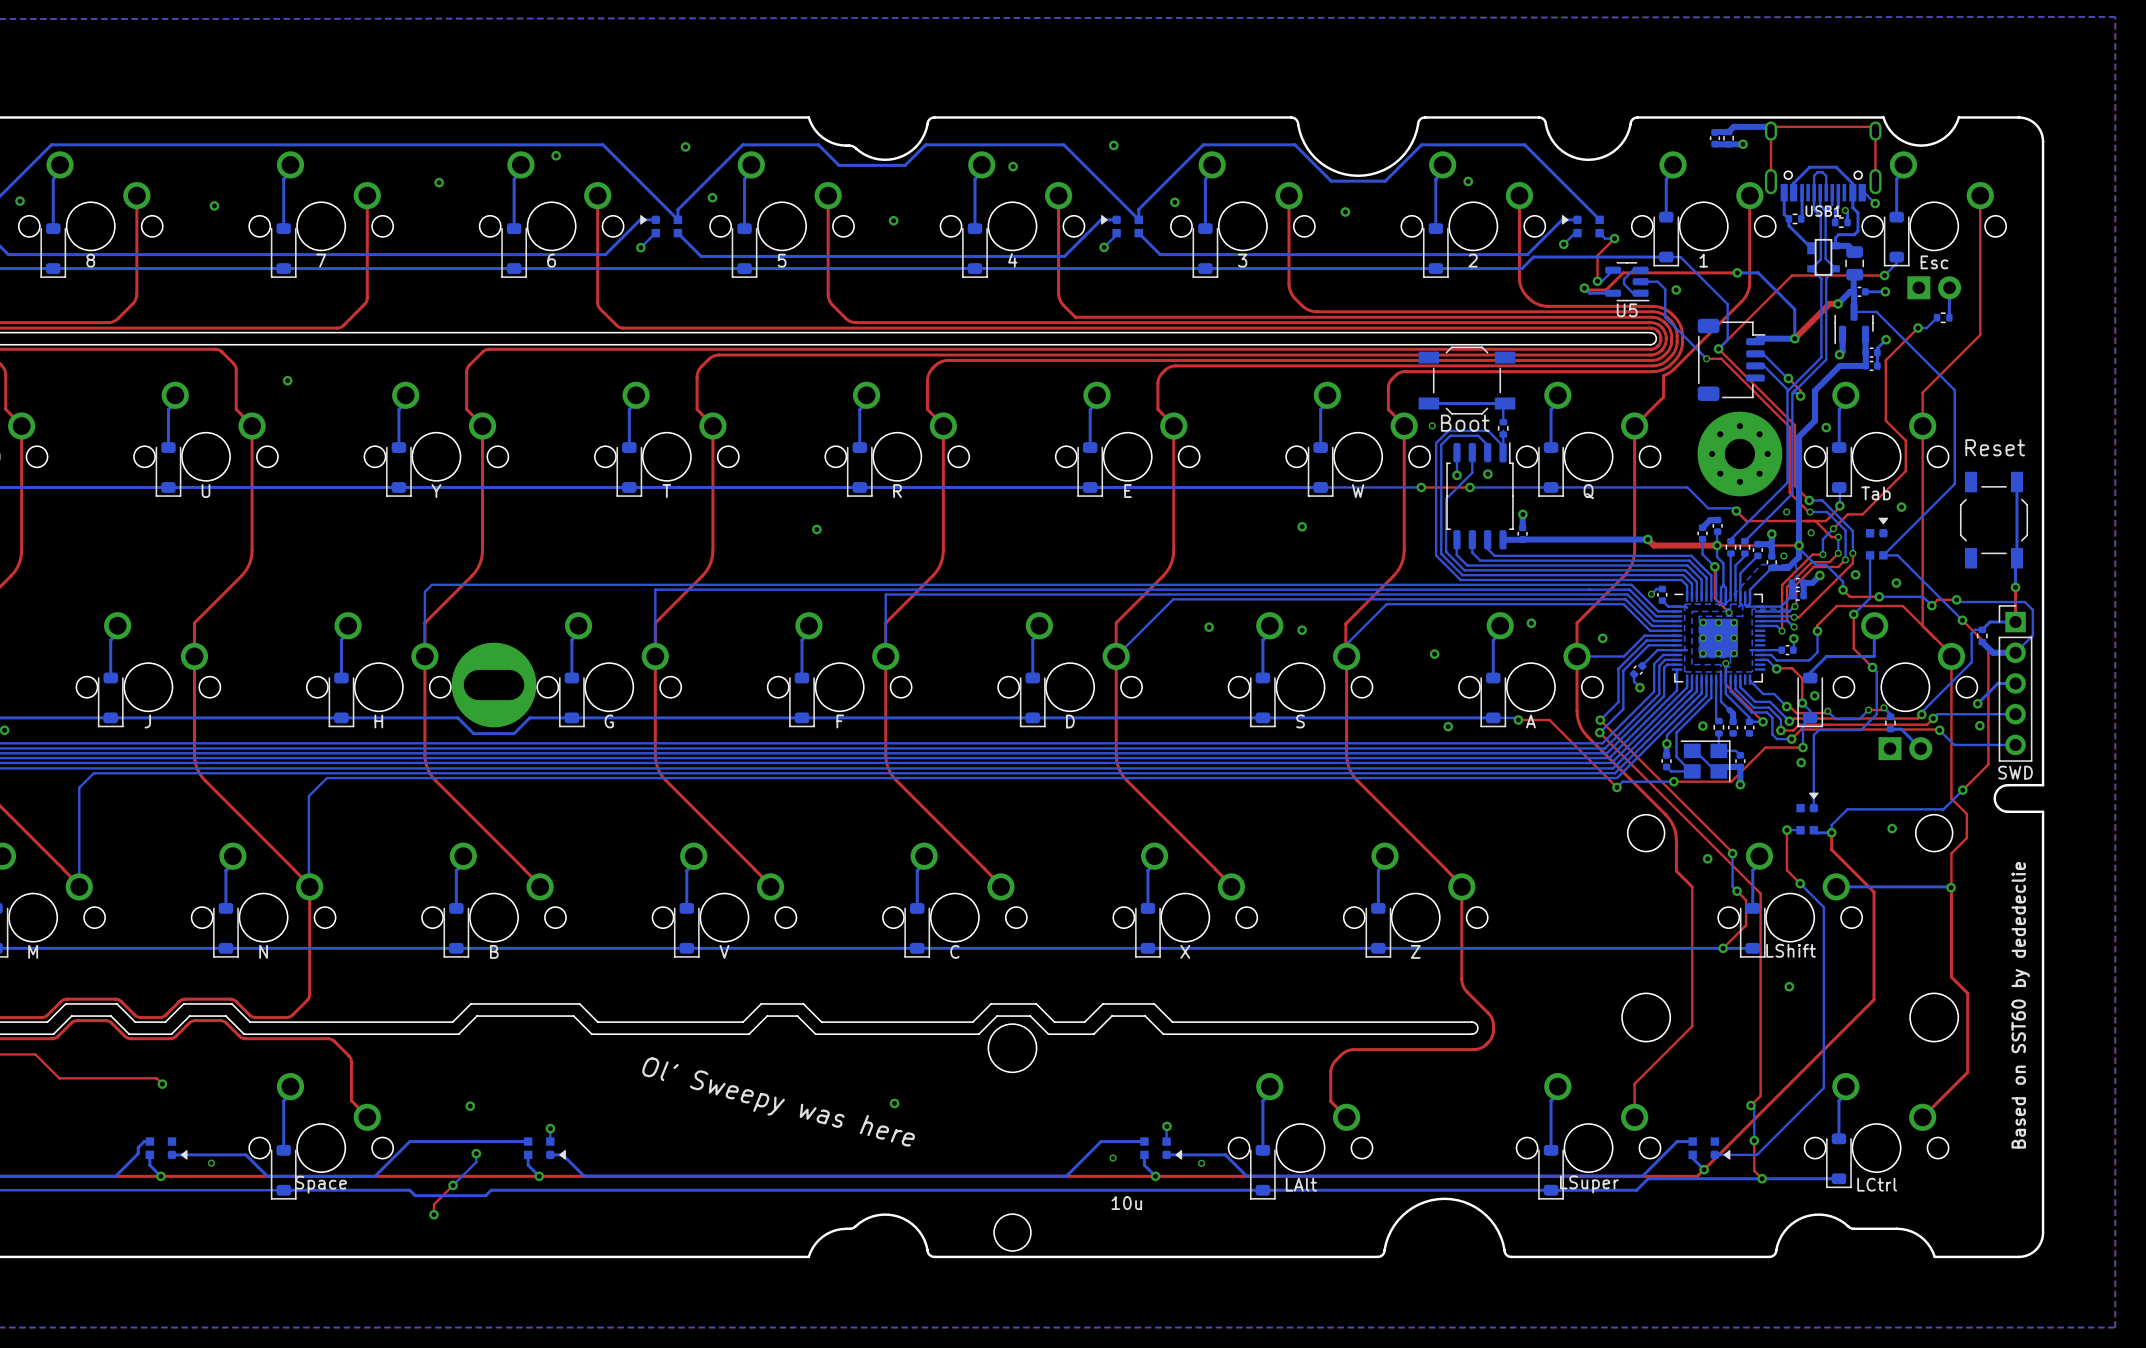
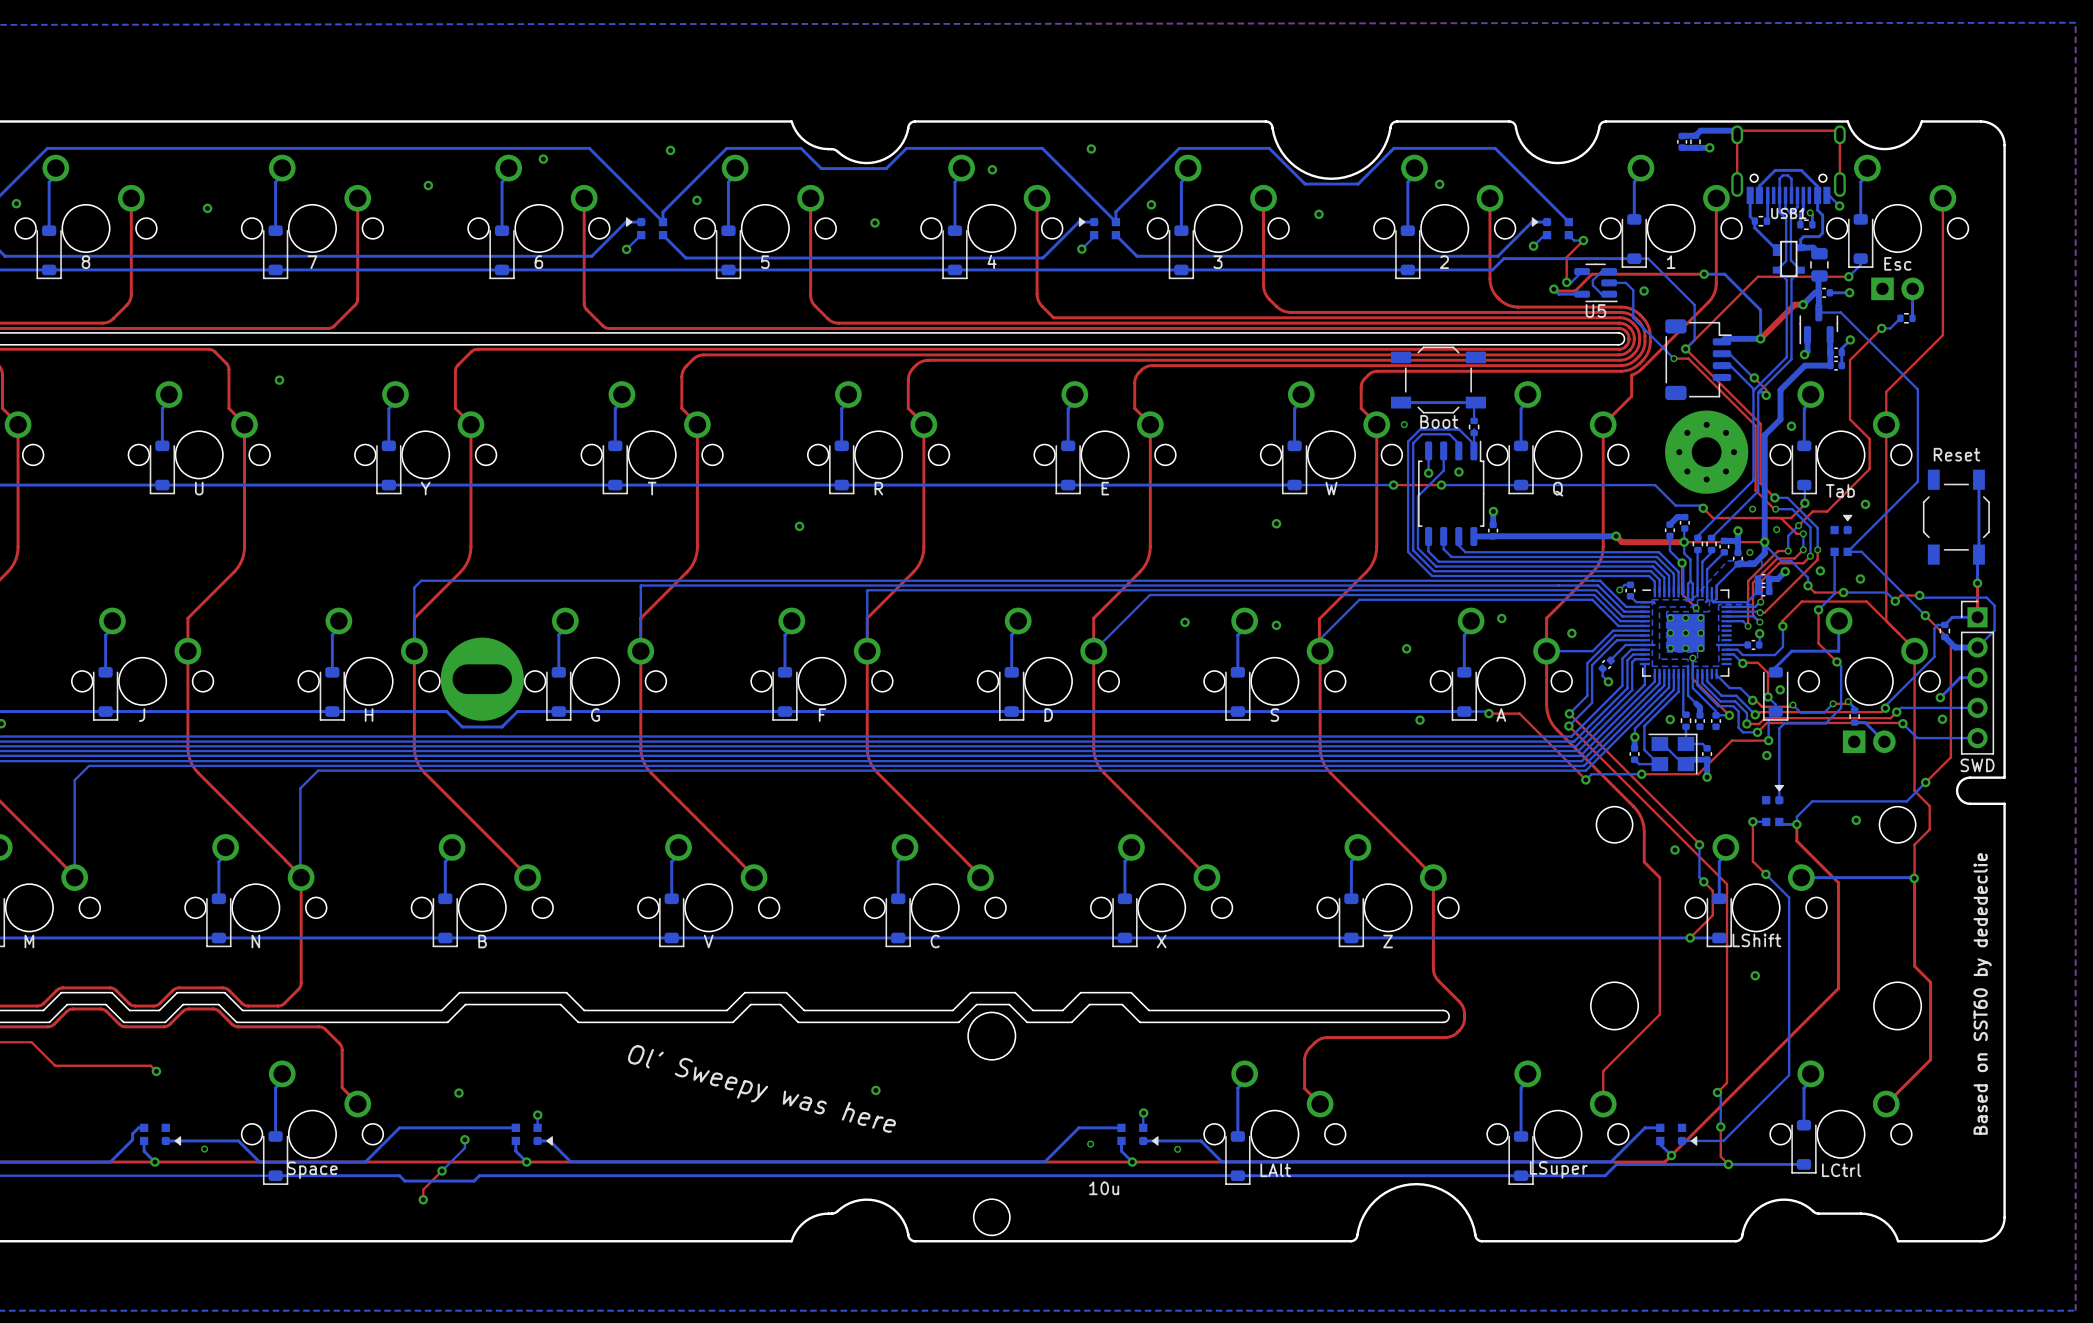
part text: Boot (1465, 423) -> none
part value: none -> Boot (1439, 421)
part text: Reset (1995, 447) -> none
part value: none -> Reset (1956, 454)

